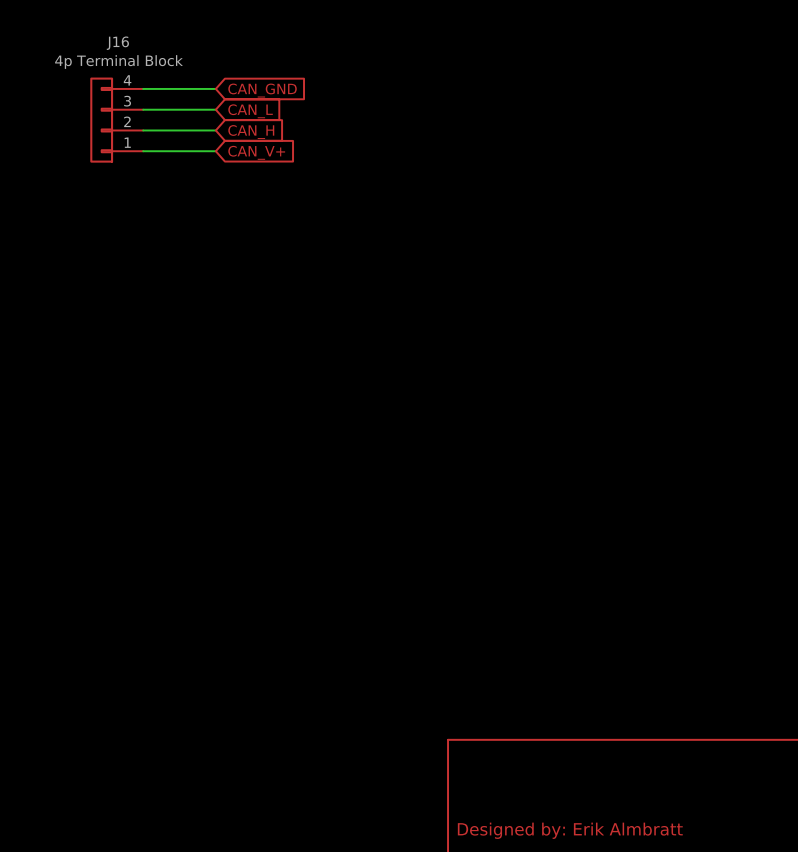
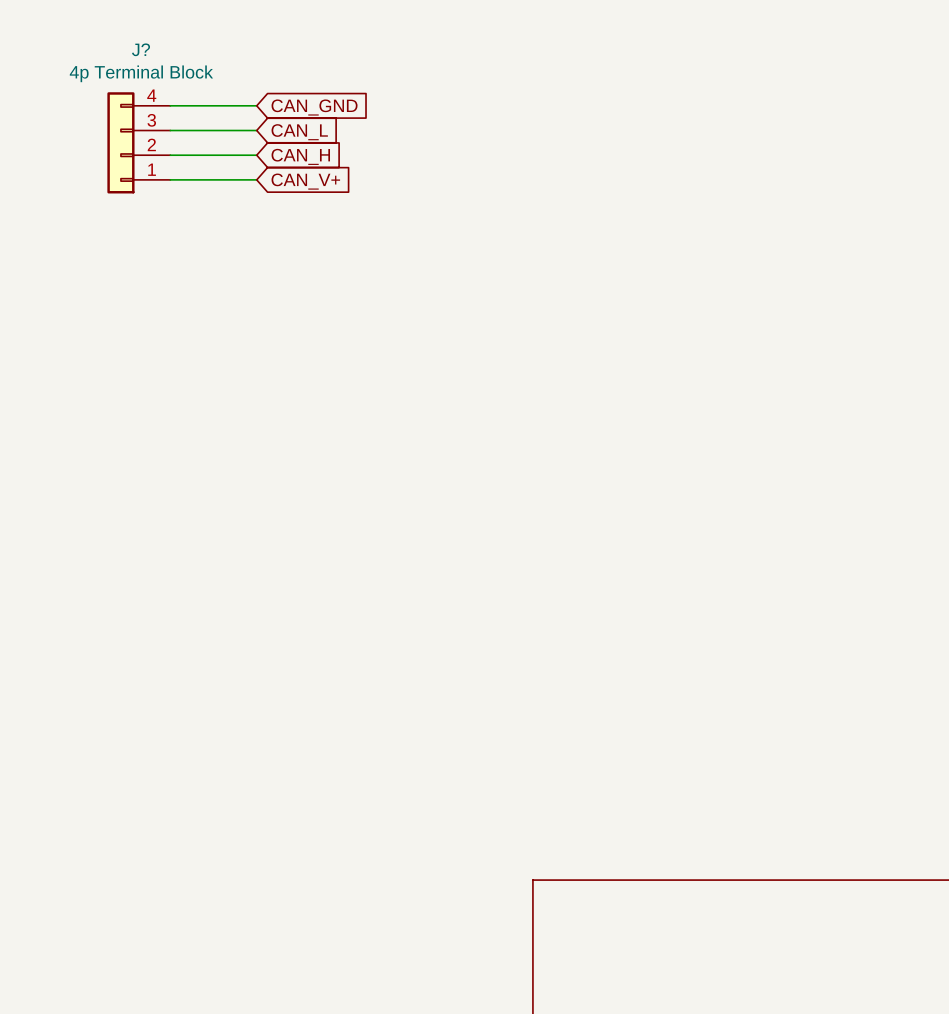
J16 name: J16 (117, 43) -> J? (141, 49)
title block: Designed by: Erik Almbratt (570, 830) -> none

